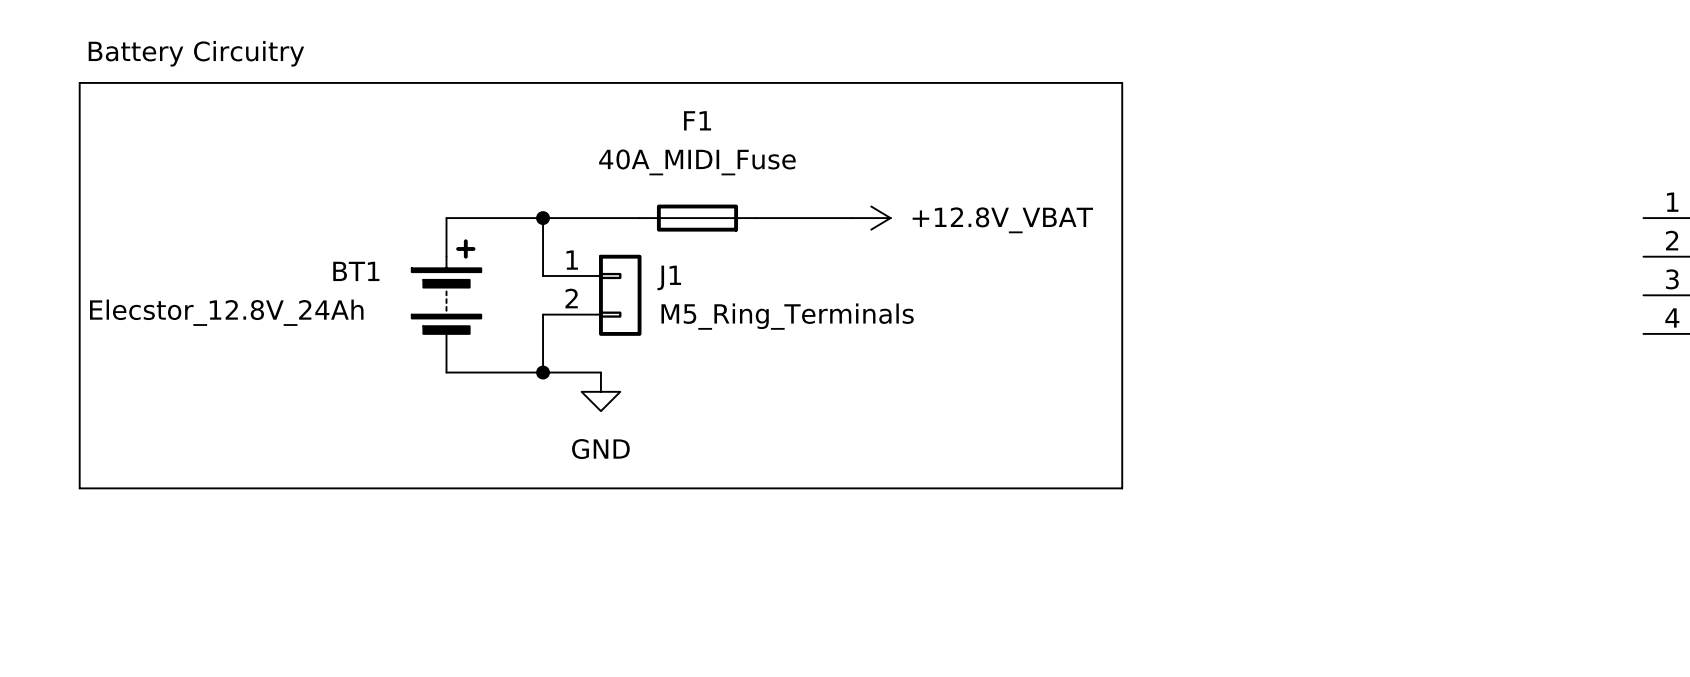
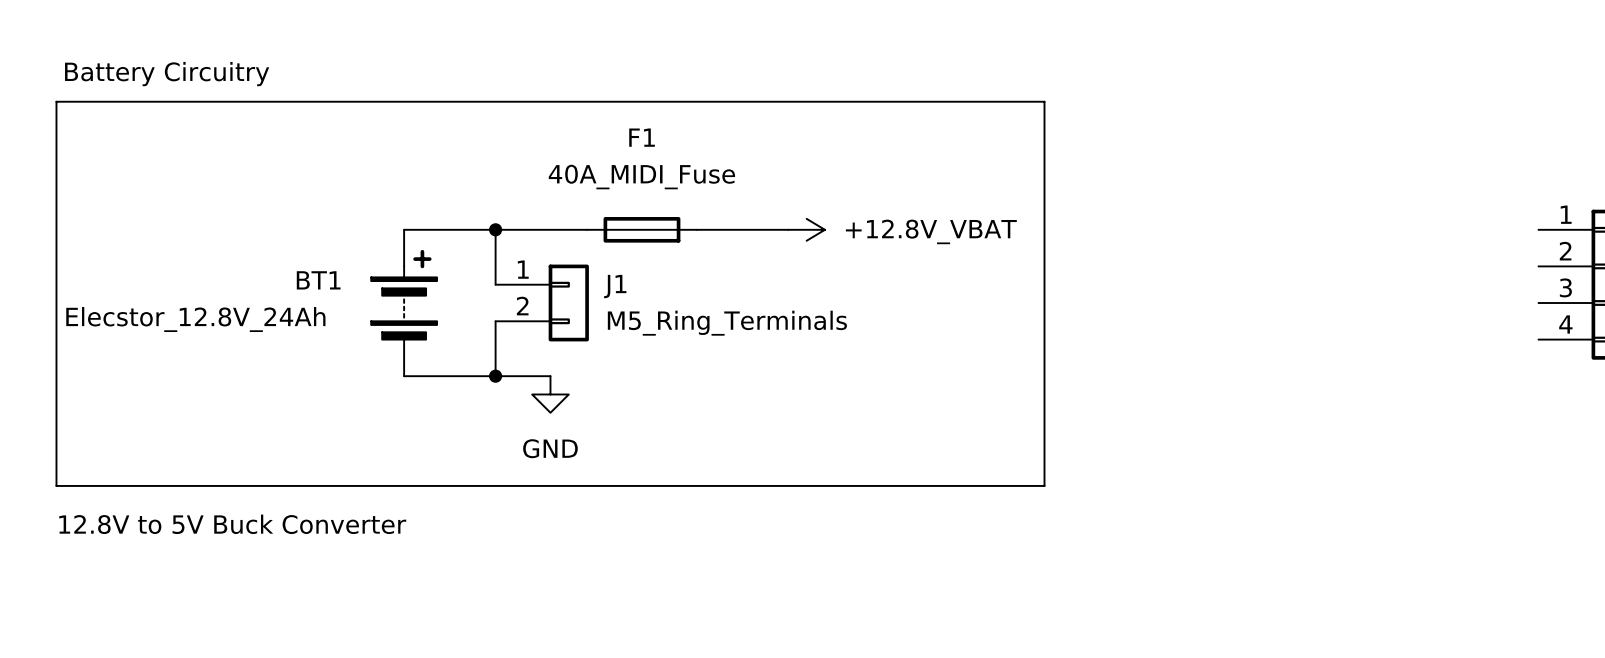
label: none -> 12.8V to 5V Buck Converter (232, 524)

